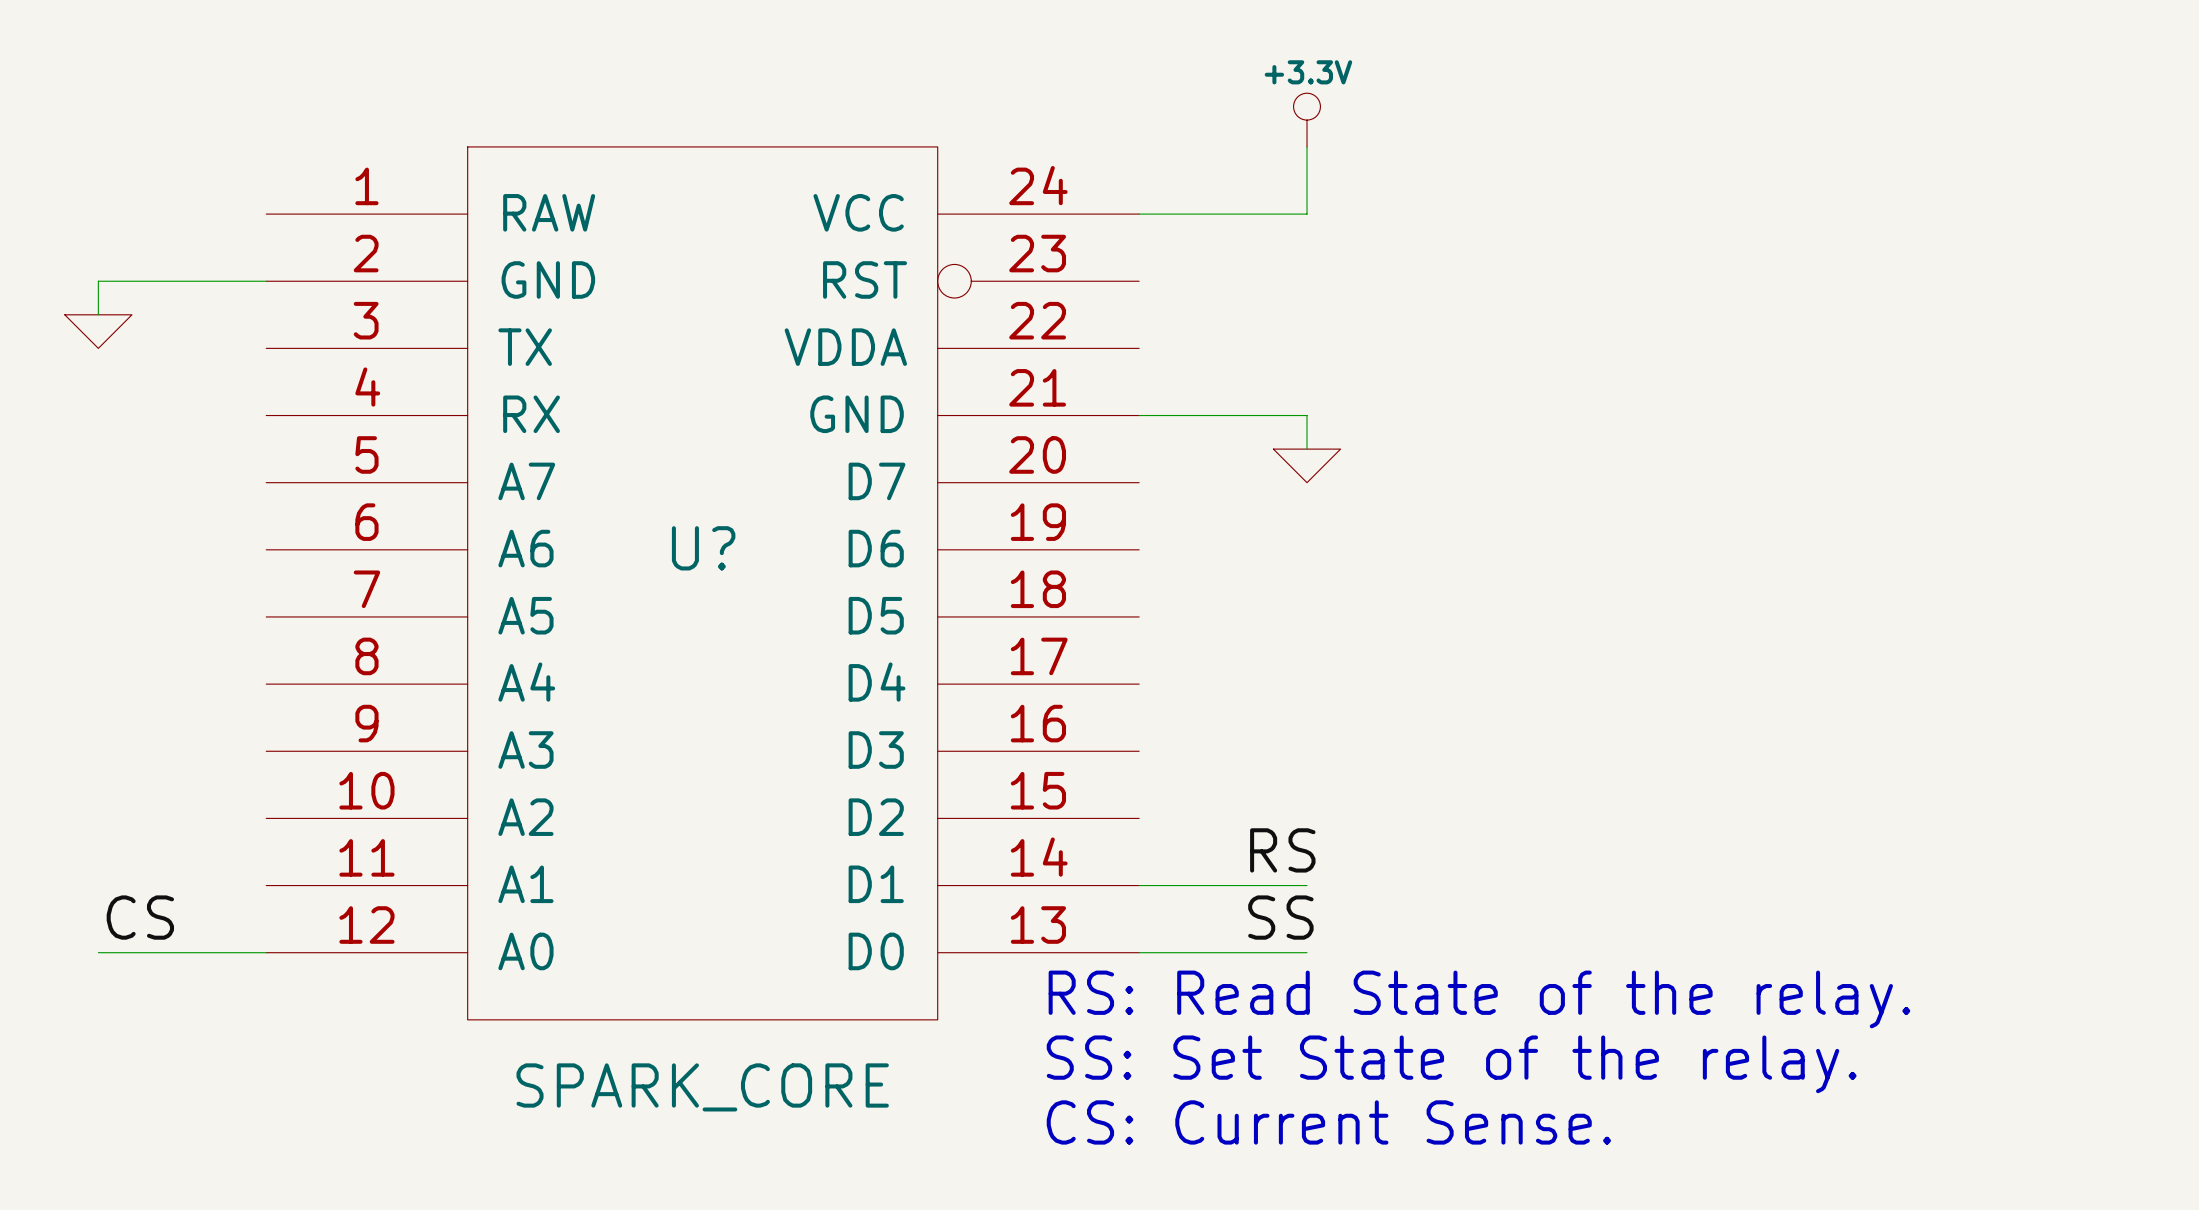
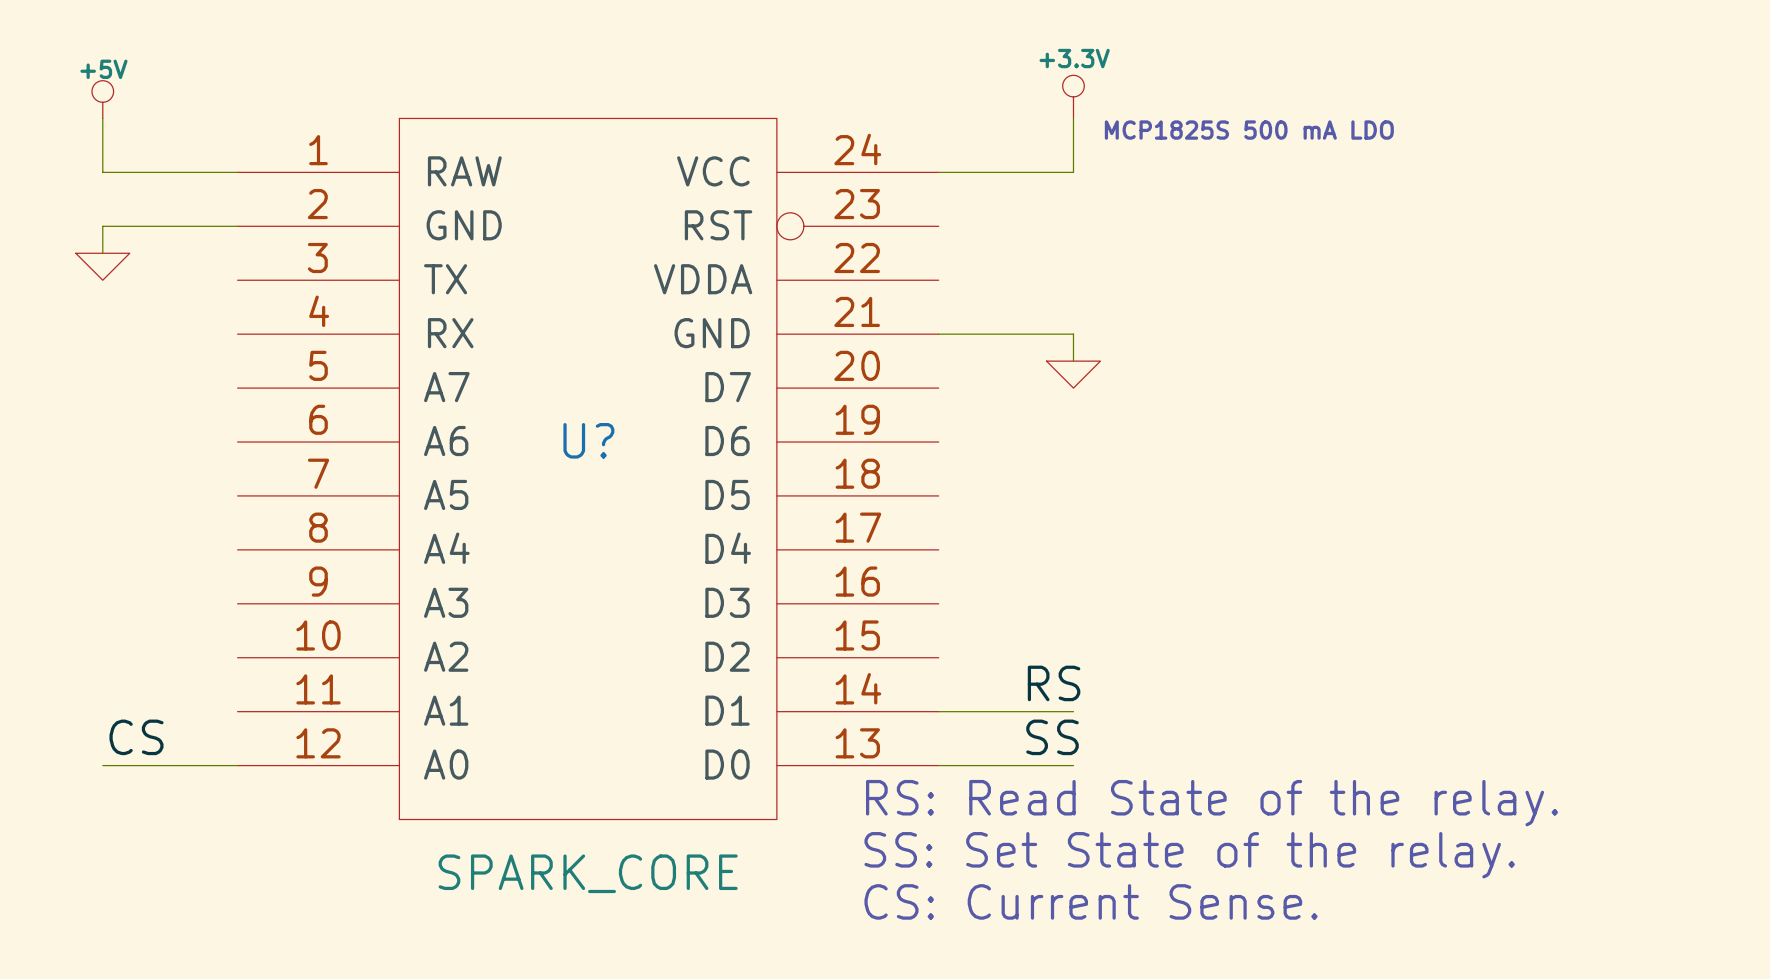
power symbol: none -> +5V (102, 99)
wire: none -> (102, 118) (102, 172) (237, 172)
text: none -> MCP1825S 500 mA LDO (1249, 130)

